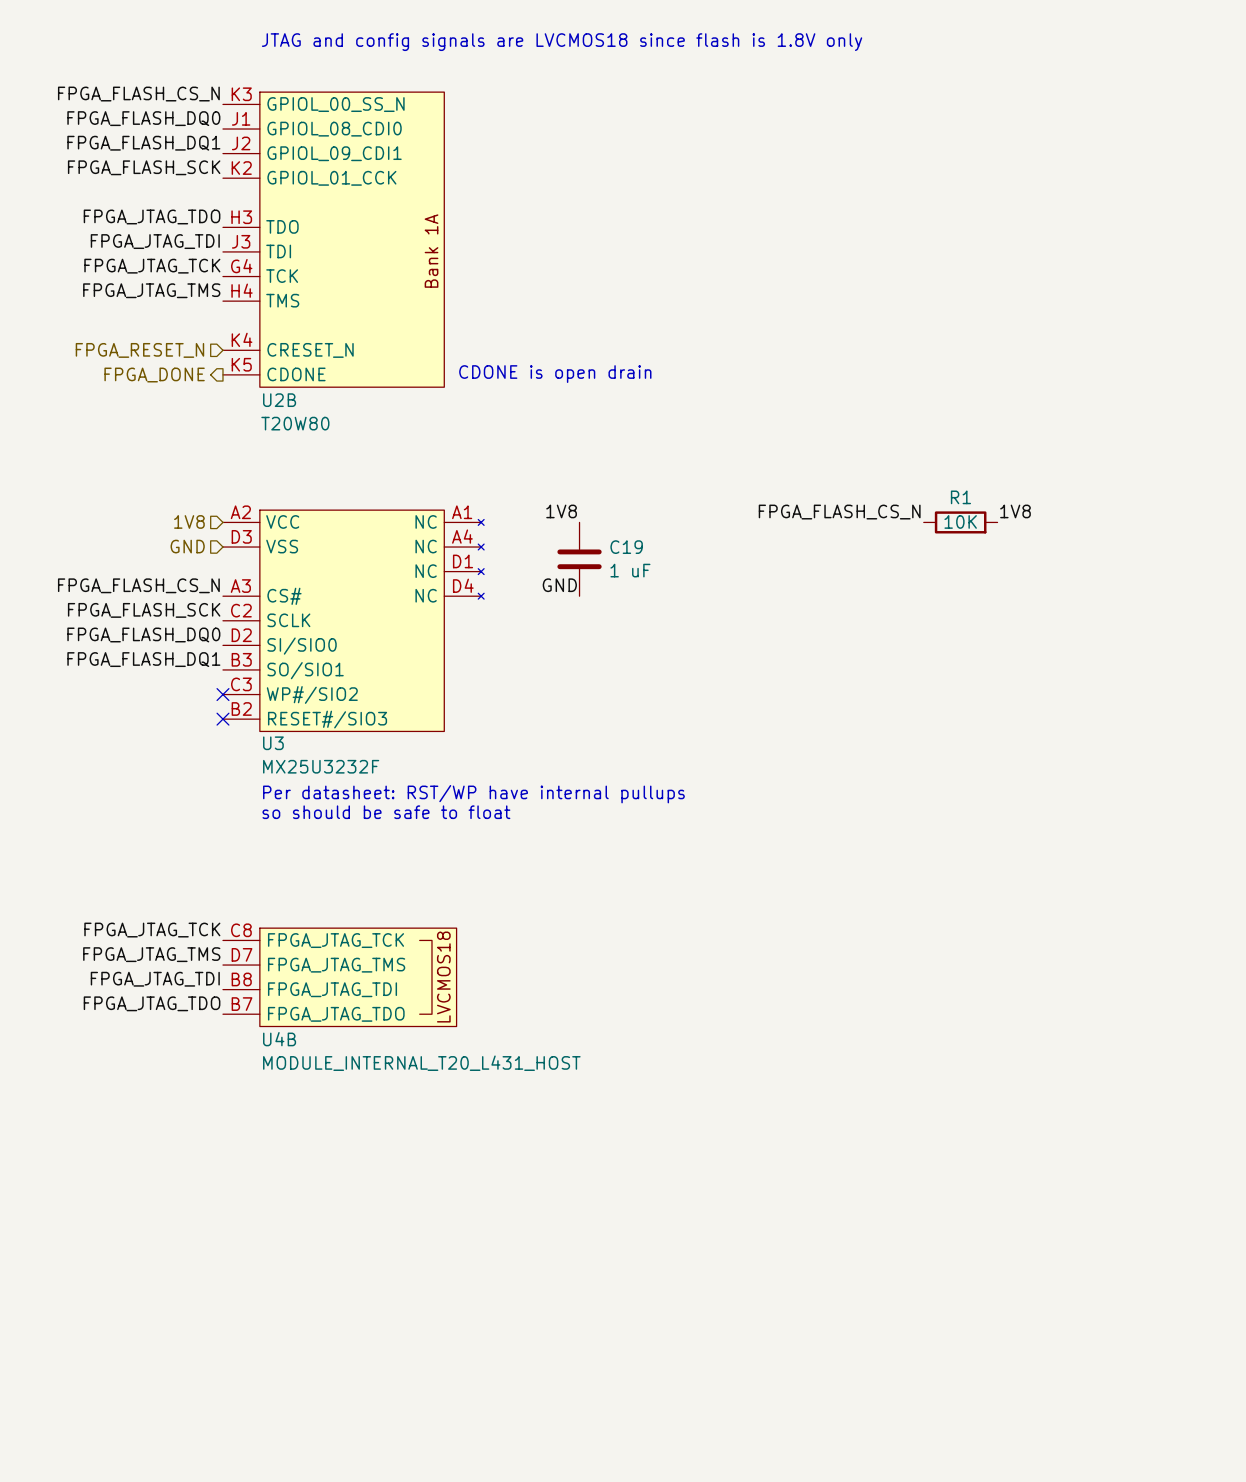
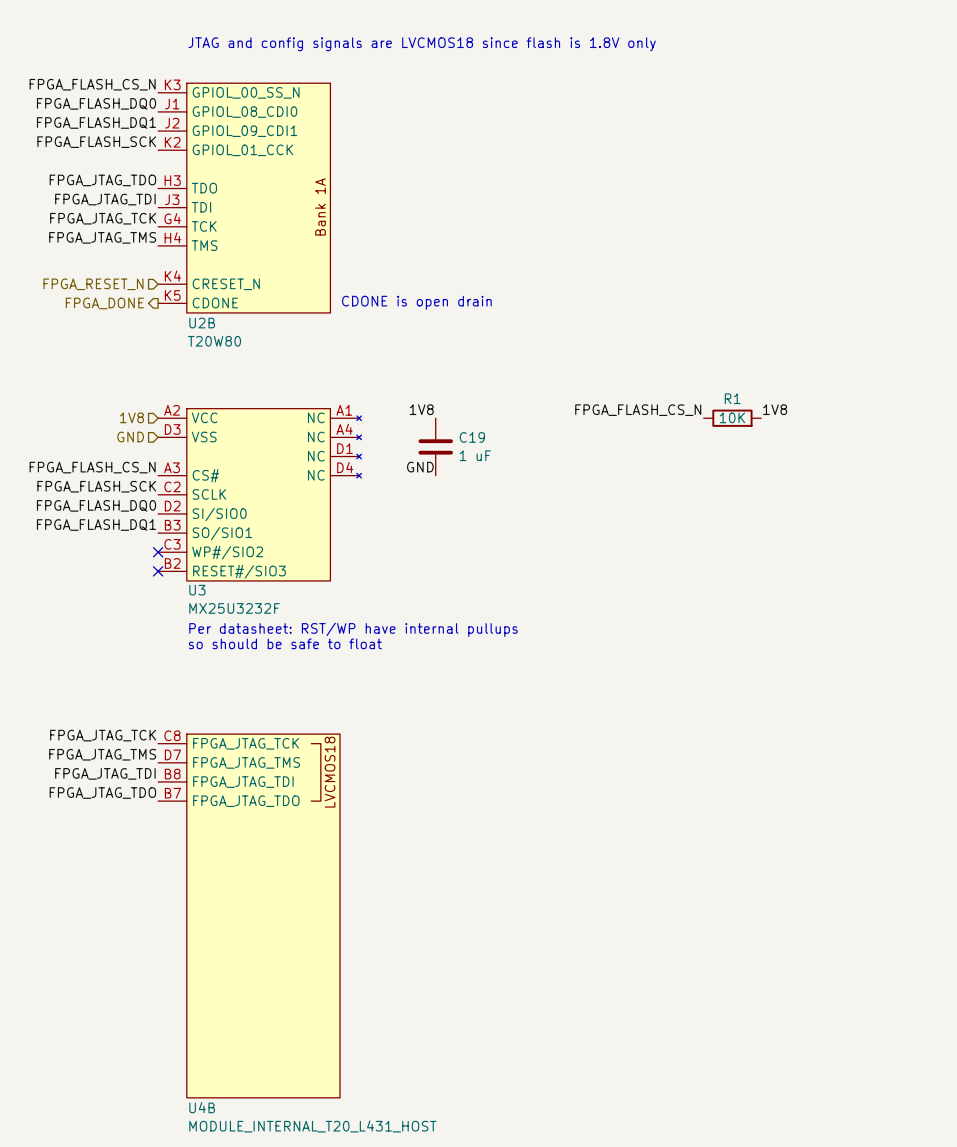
U4B symbol: [222, 928, 457, 1027] -> [158, 734, 340, 1098]
U4B name position: U4B (279, 1039) -> U4B (202, 1107)
U4B value position: MODULE_INTERNAL_T20_L431_HOST (421, 1063) -> MODULE_INTERNAL_T20_L431_HOST (312, 1126)

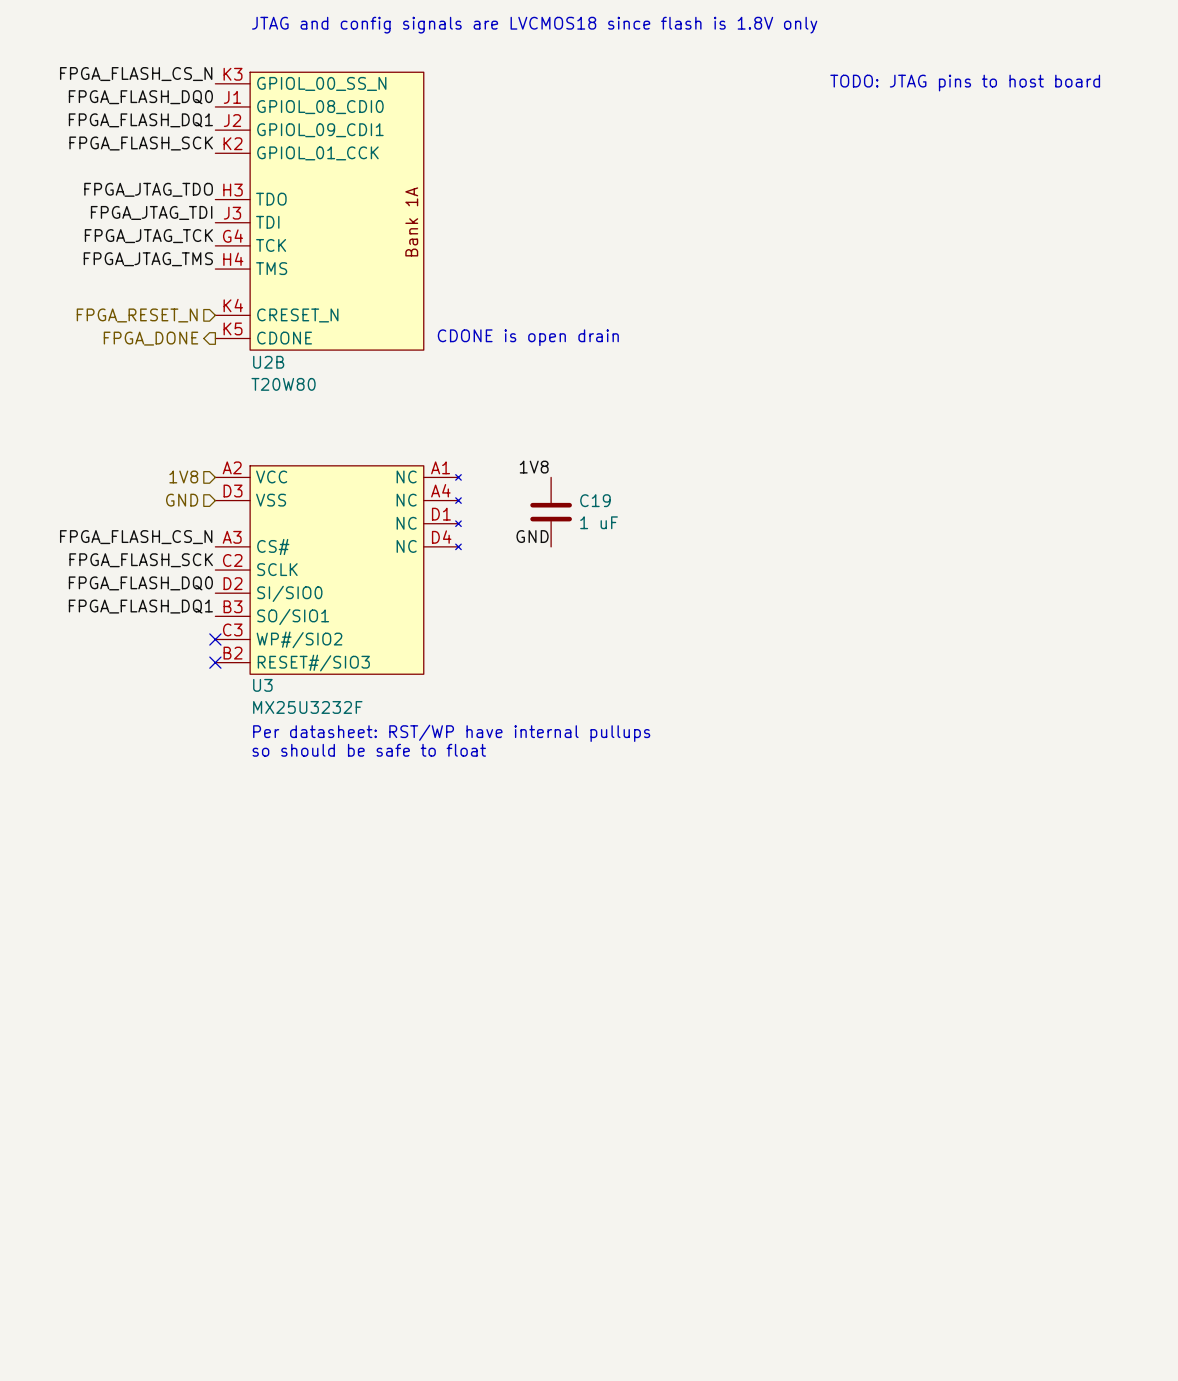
text: none -> TODO: JTAG pins to host board (965, 83)
label: 1V8 (775, 409) -> none
label: FPGA_FLASH_CS_N (638, 410) -> none
R1: 10K (732, 418) -> none
label: FPGA_JTAG_TCK (103, 735) -> none
label: FPGA_JTAG_TMS (102, 754) -> none
label: FPGA_JTAG_TDI (105, 773) -> none
label: FPGA_JTAG_TDO (102, 793) -> none
U4B: MODULE_INTERNAL_T20_L431_HOST (249, 915) -> none

